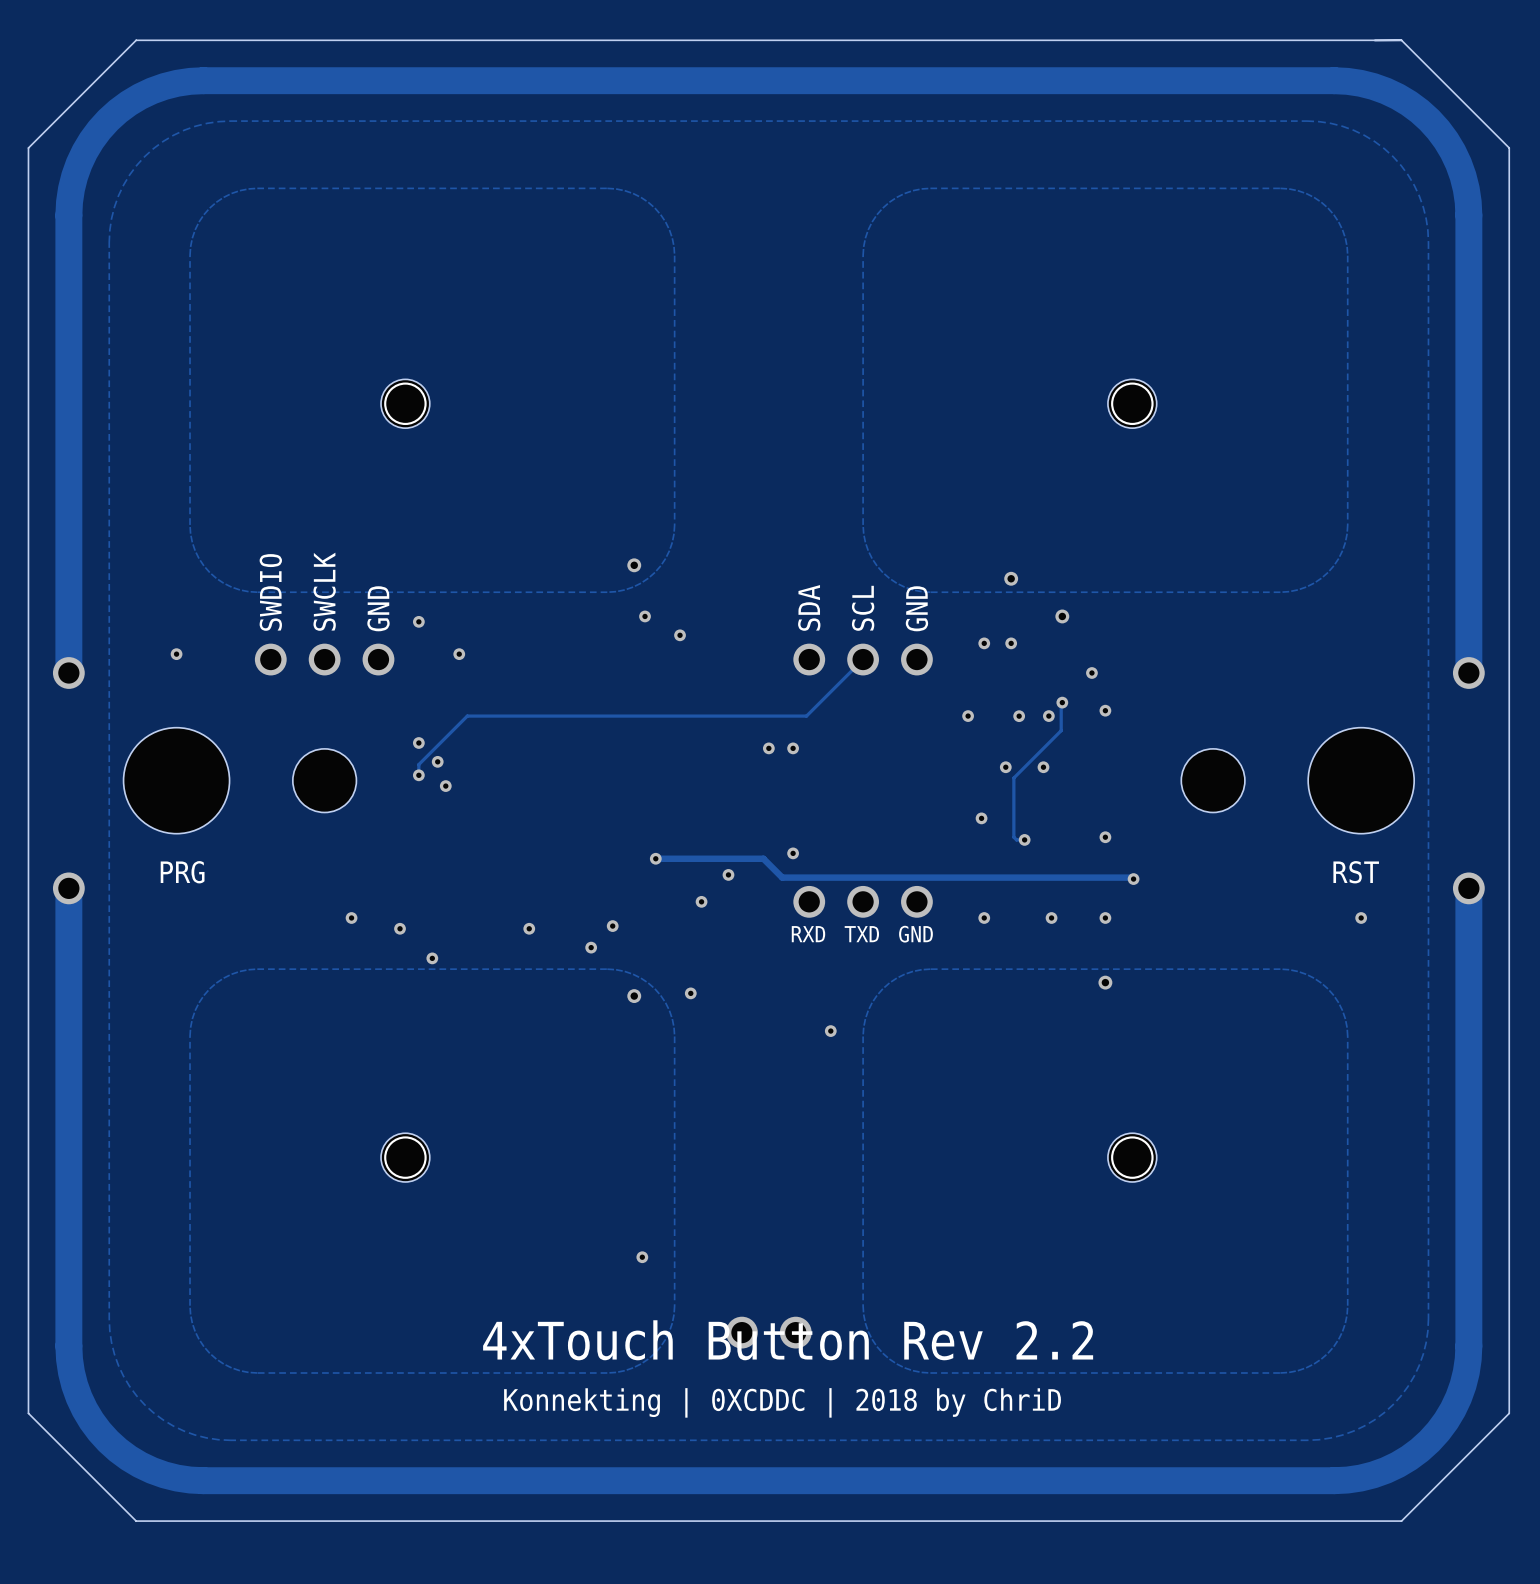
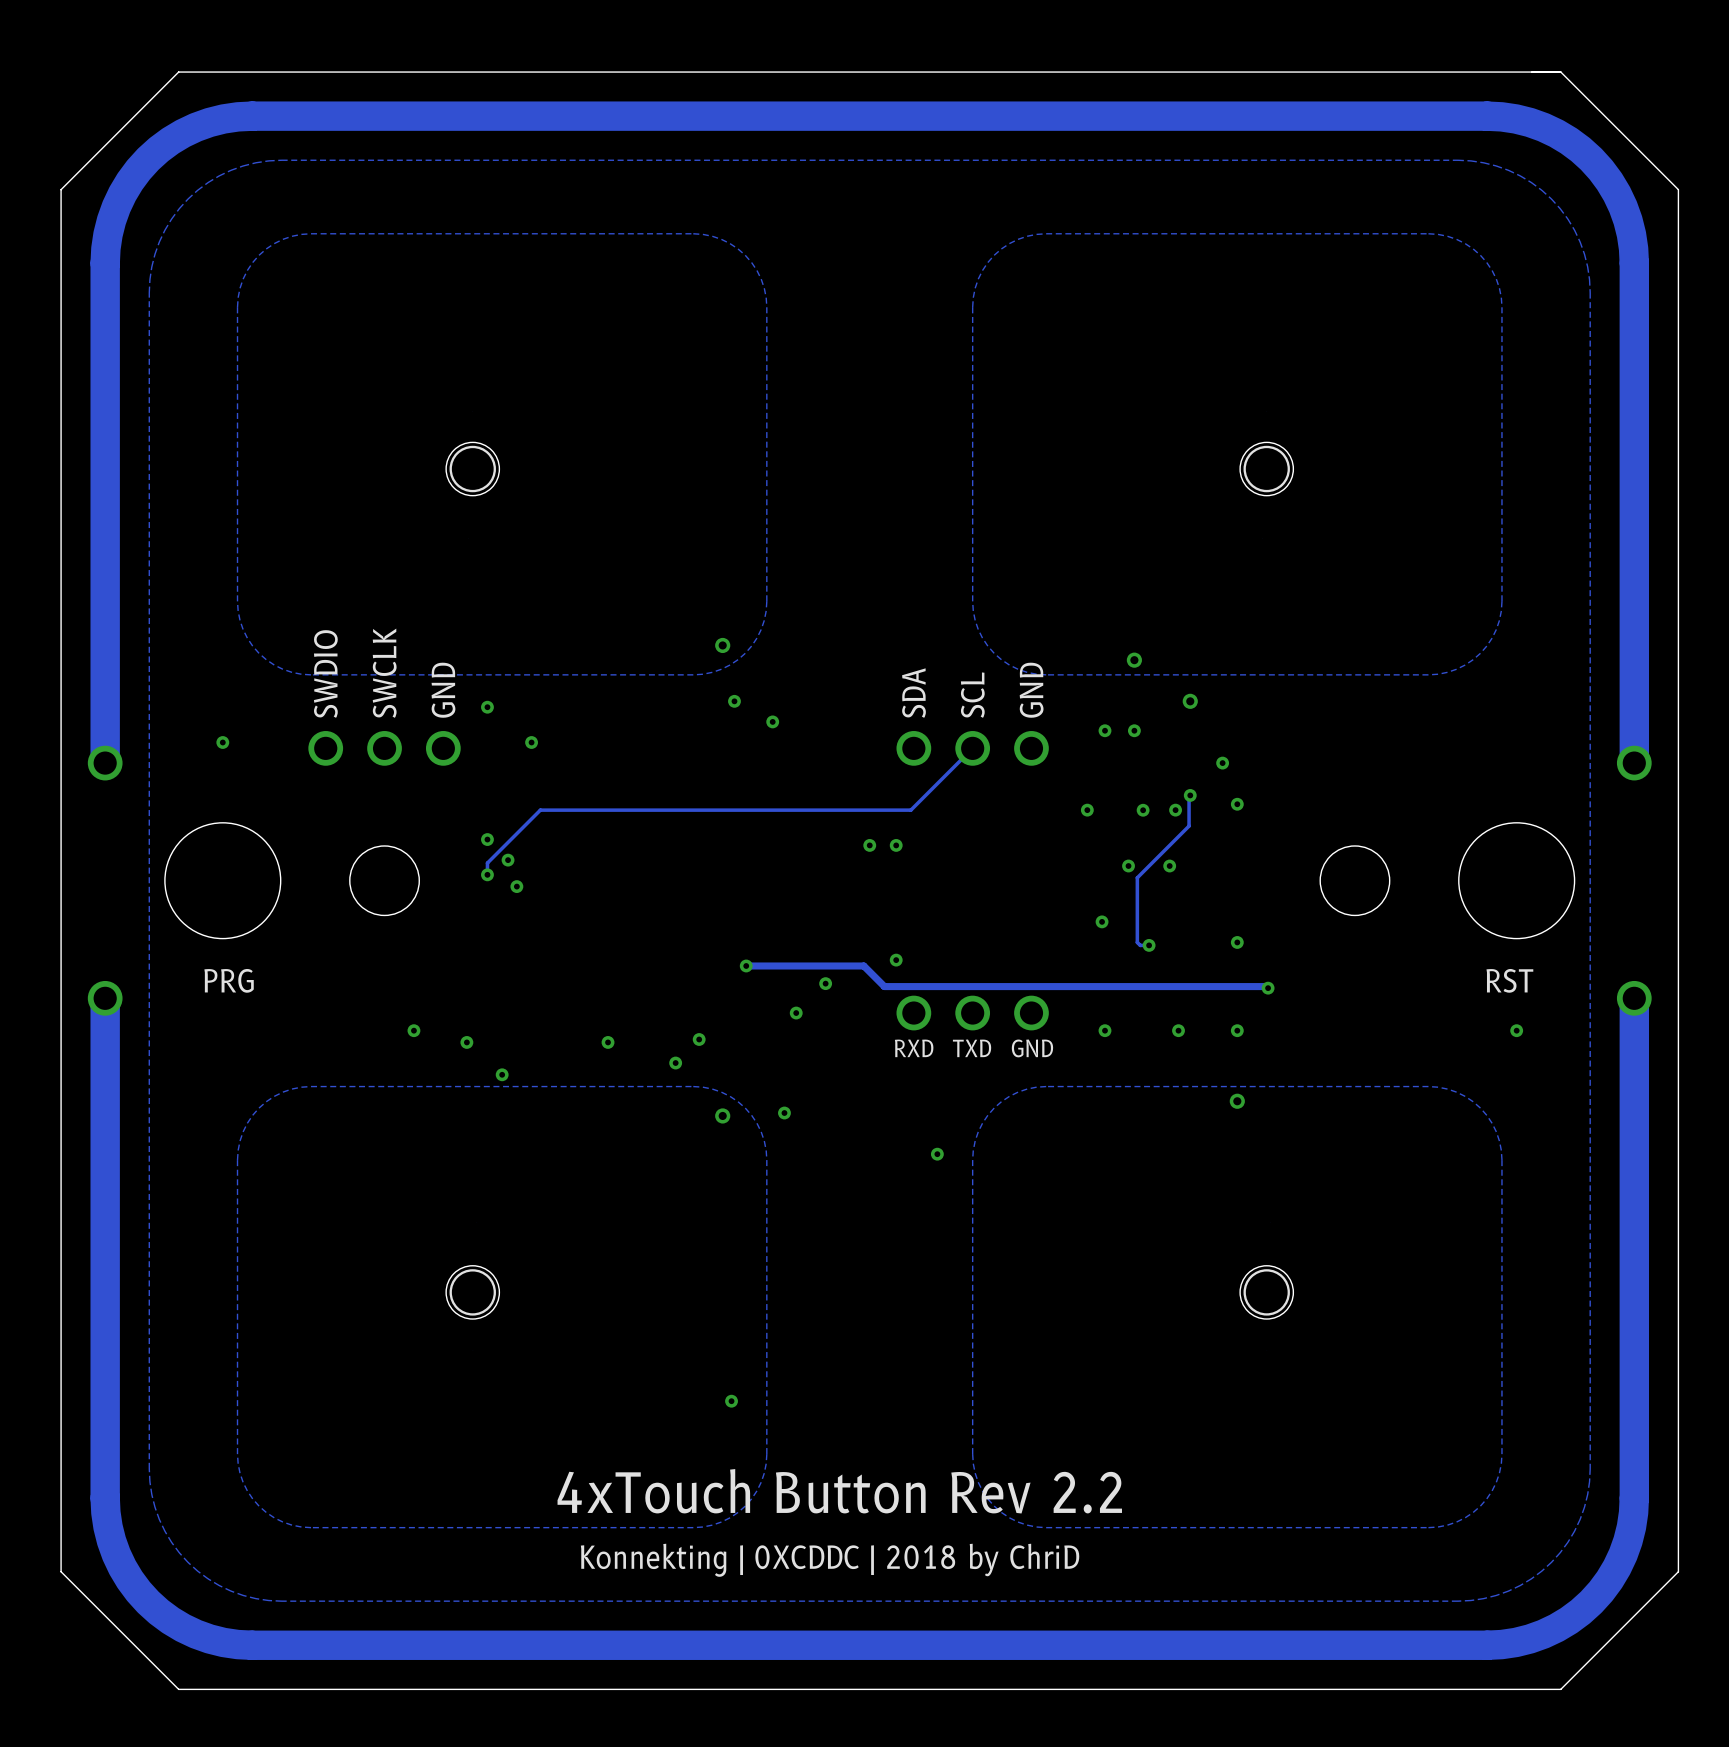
via: (741, 1332) -> none
via: (795, 1332) -> none

